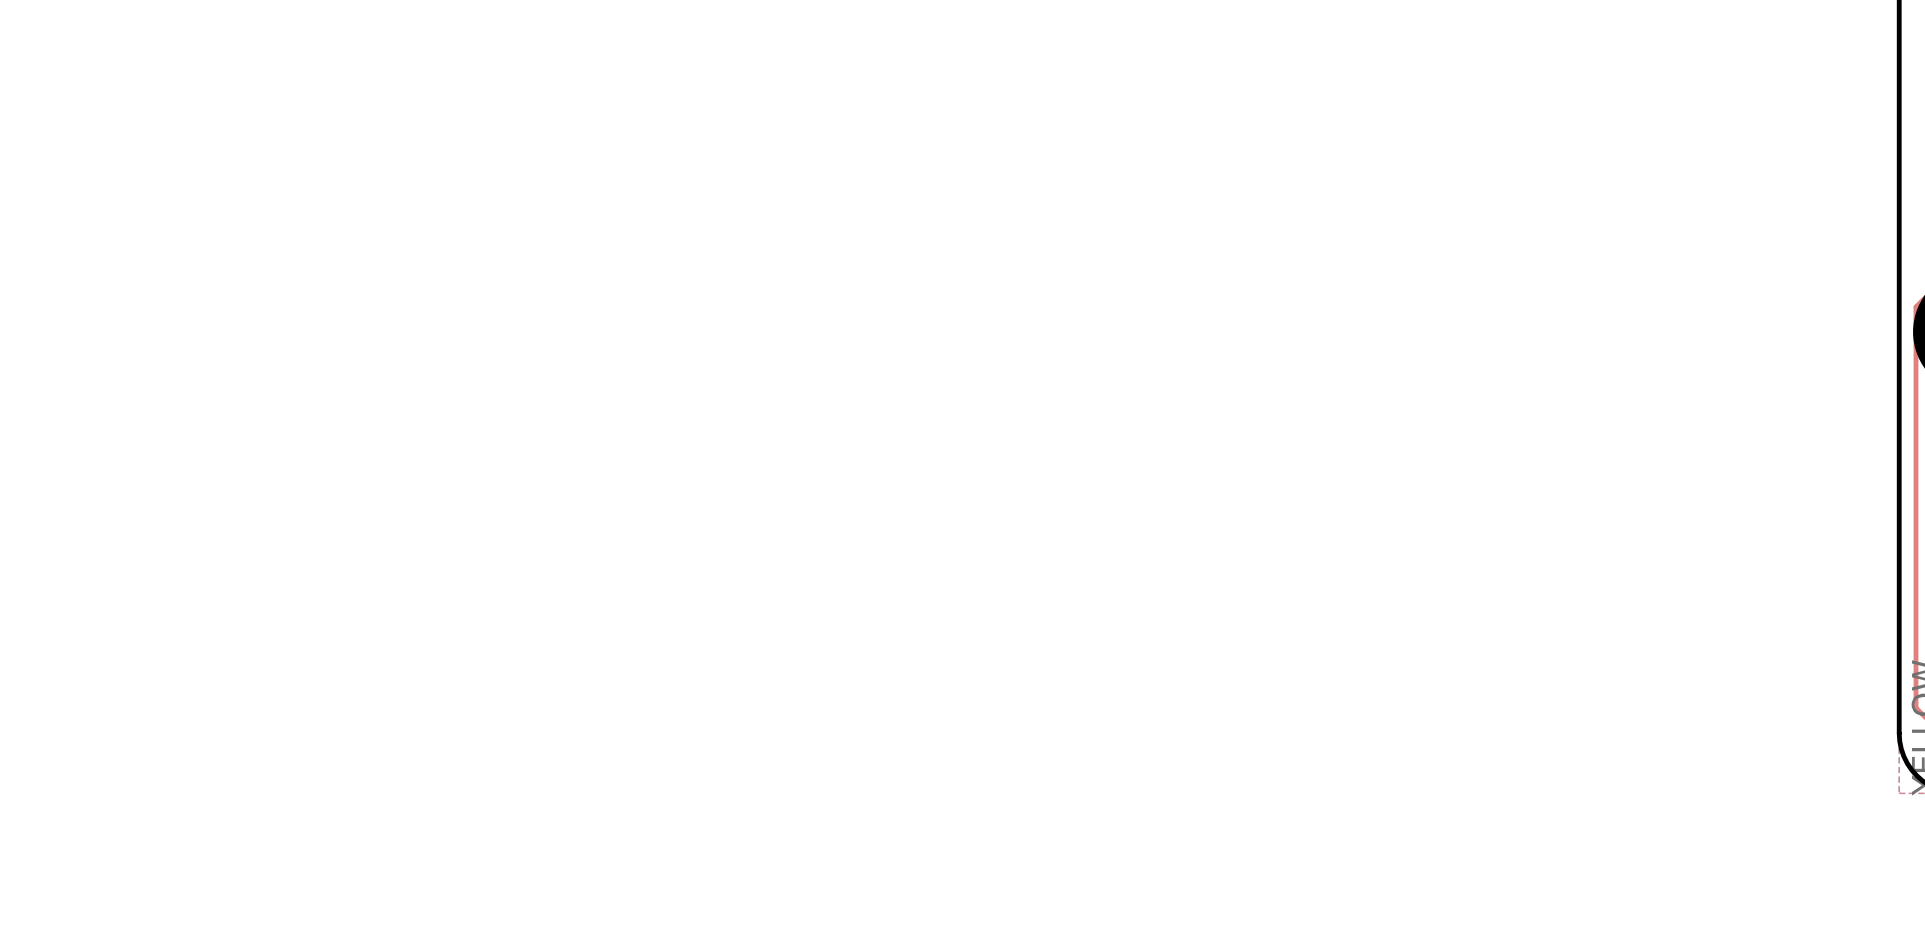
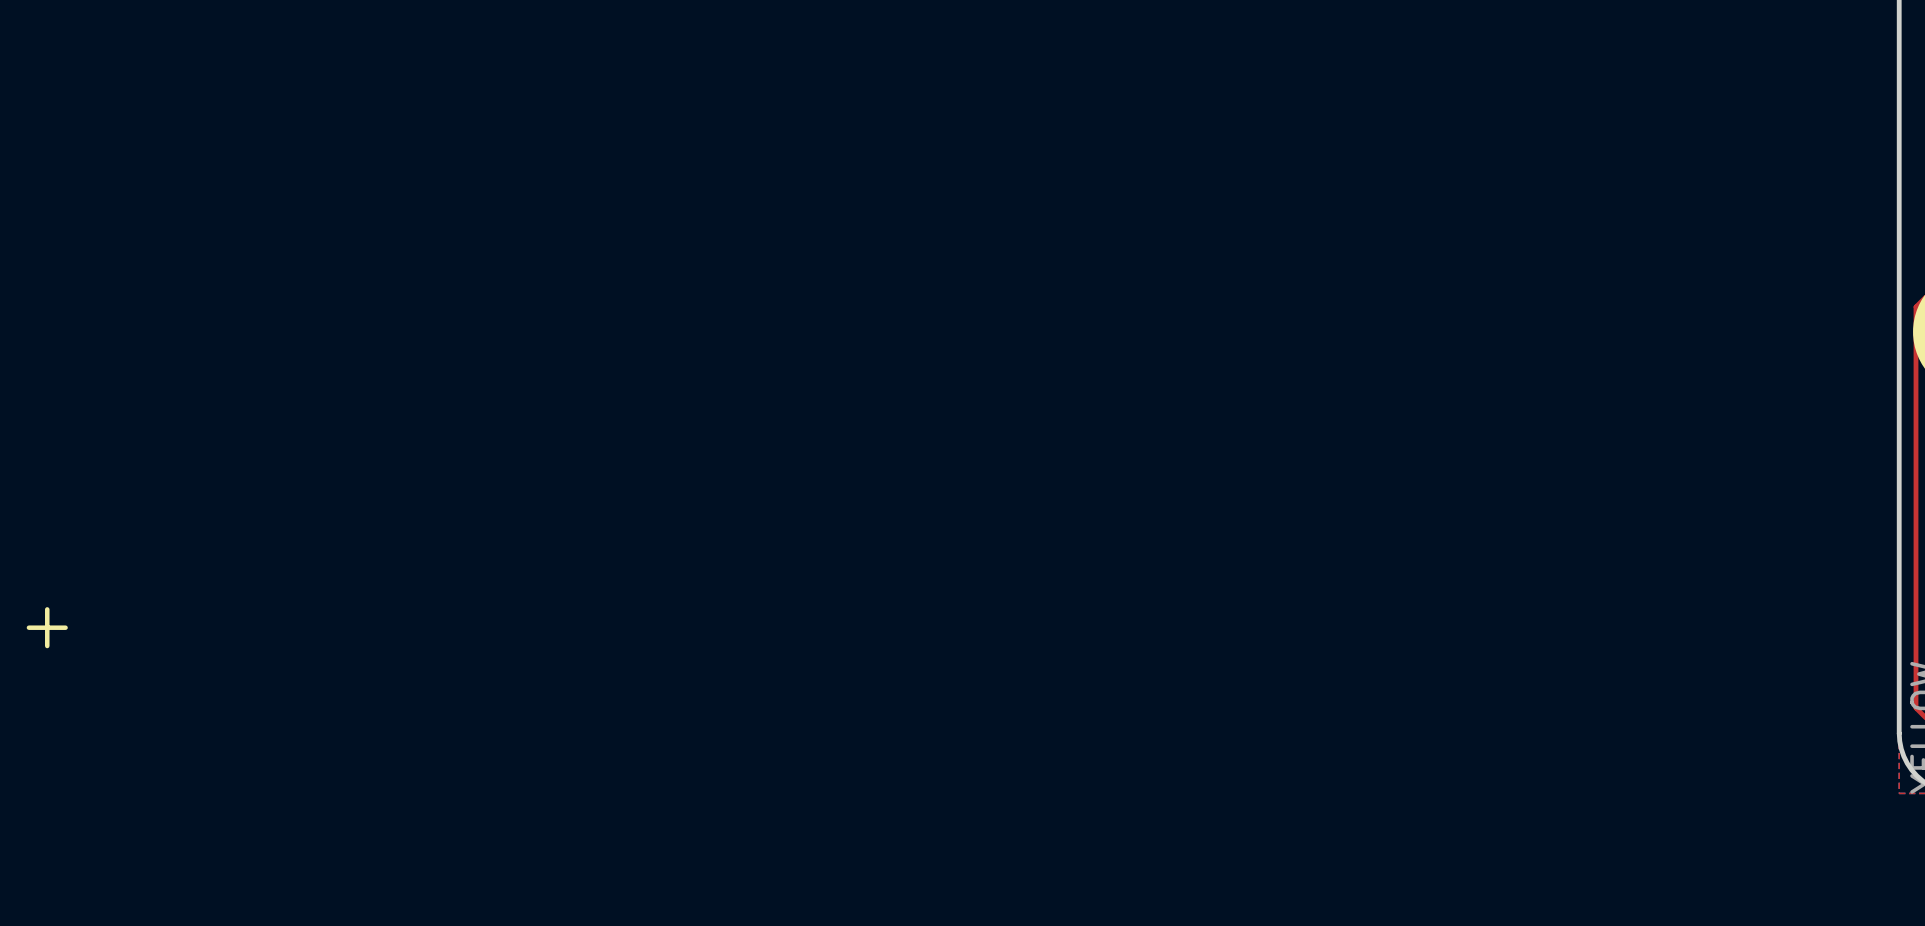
text: none -> + (47, 627)

